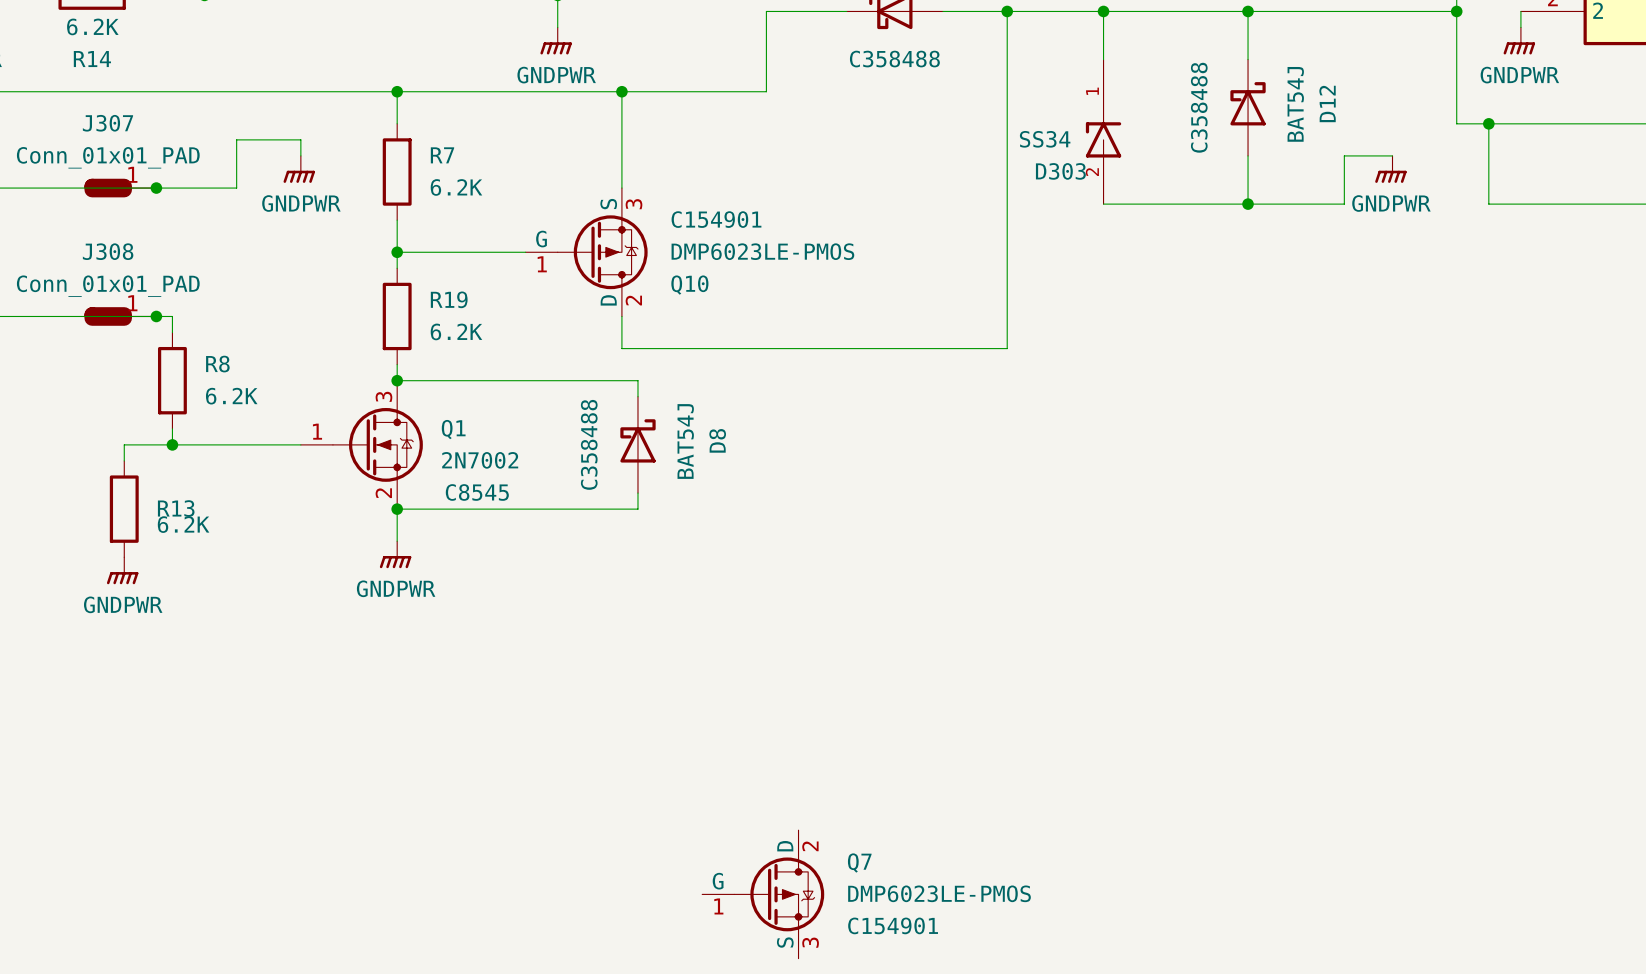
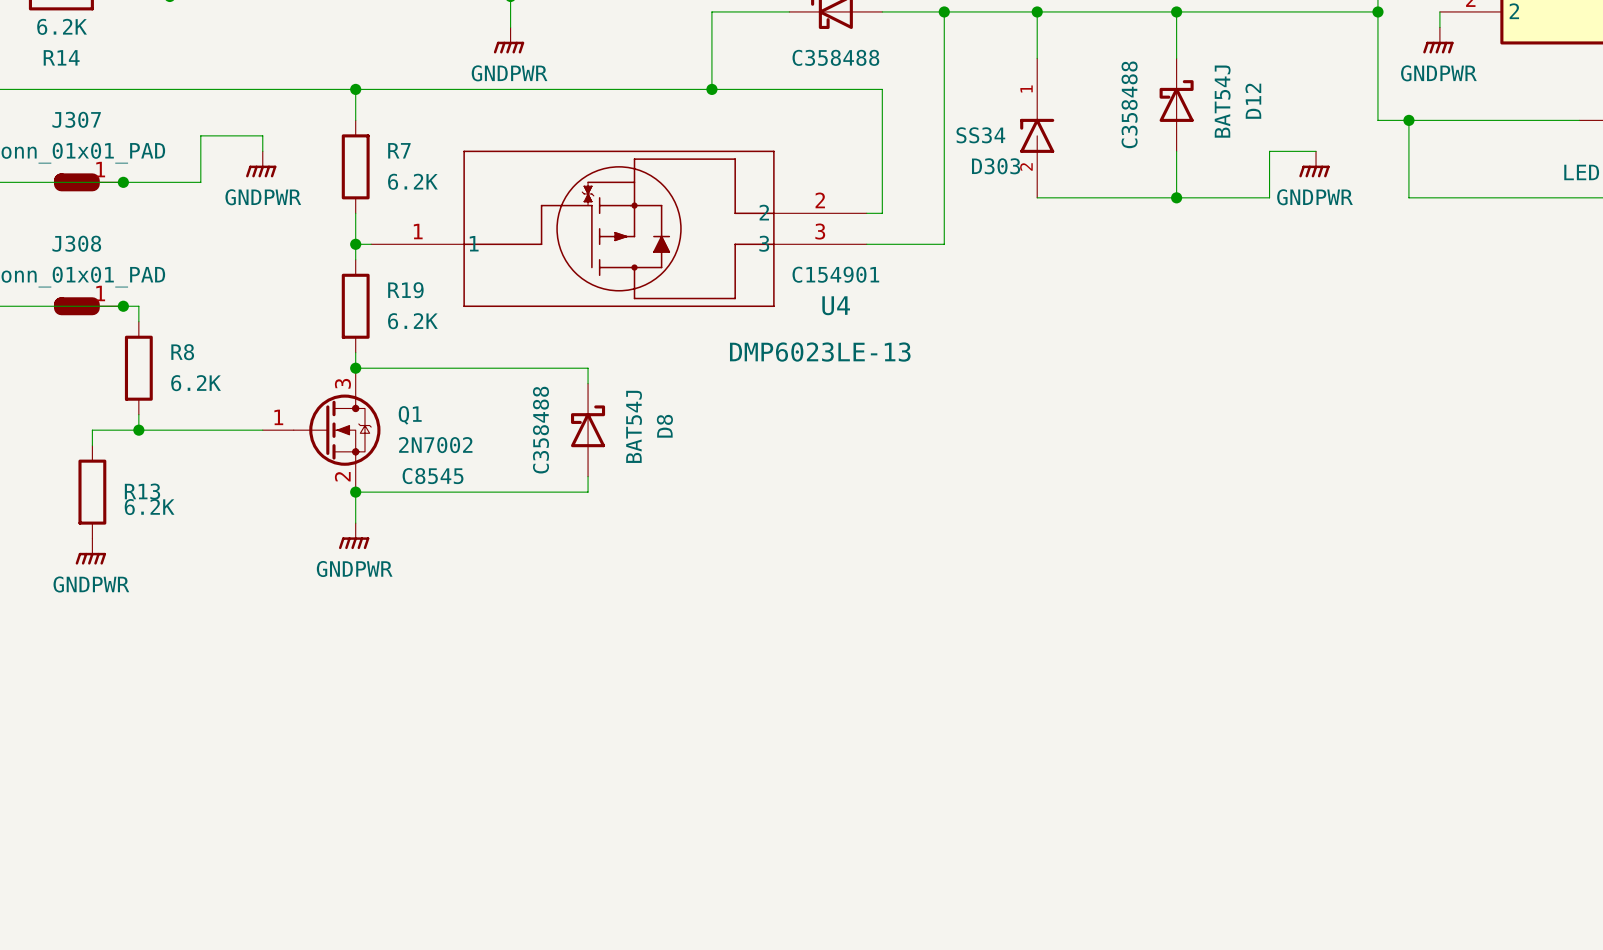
wire: (621, 91) (621, 188) -> none
junction: (621, 91) -> none
wire: none -> (711, 89) (882, 89) (882, 213) (866, 213)
junction: none -> (711, 89)
U4: none -> DMP6023LE-13 (619, 228)
Q10: DMP6023LE-PMOS (586, 252) -> none
wire: (1007, 252) (1007, 348) (621, 348) (621, 316) -> (944, 244) (866, 244)
Q7: DMP6023LE-PMOS (763, 894) -> none

